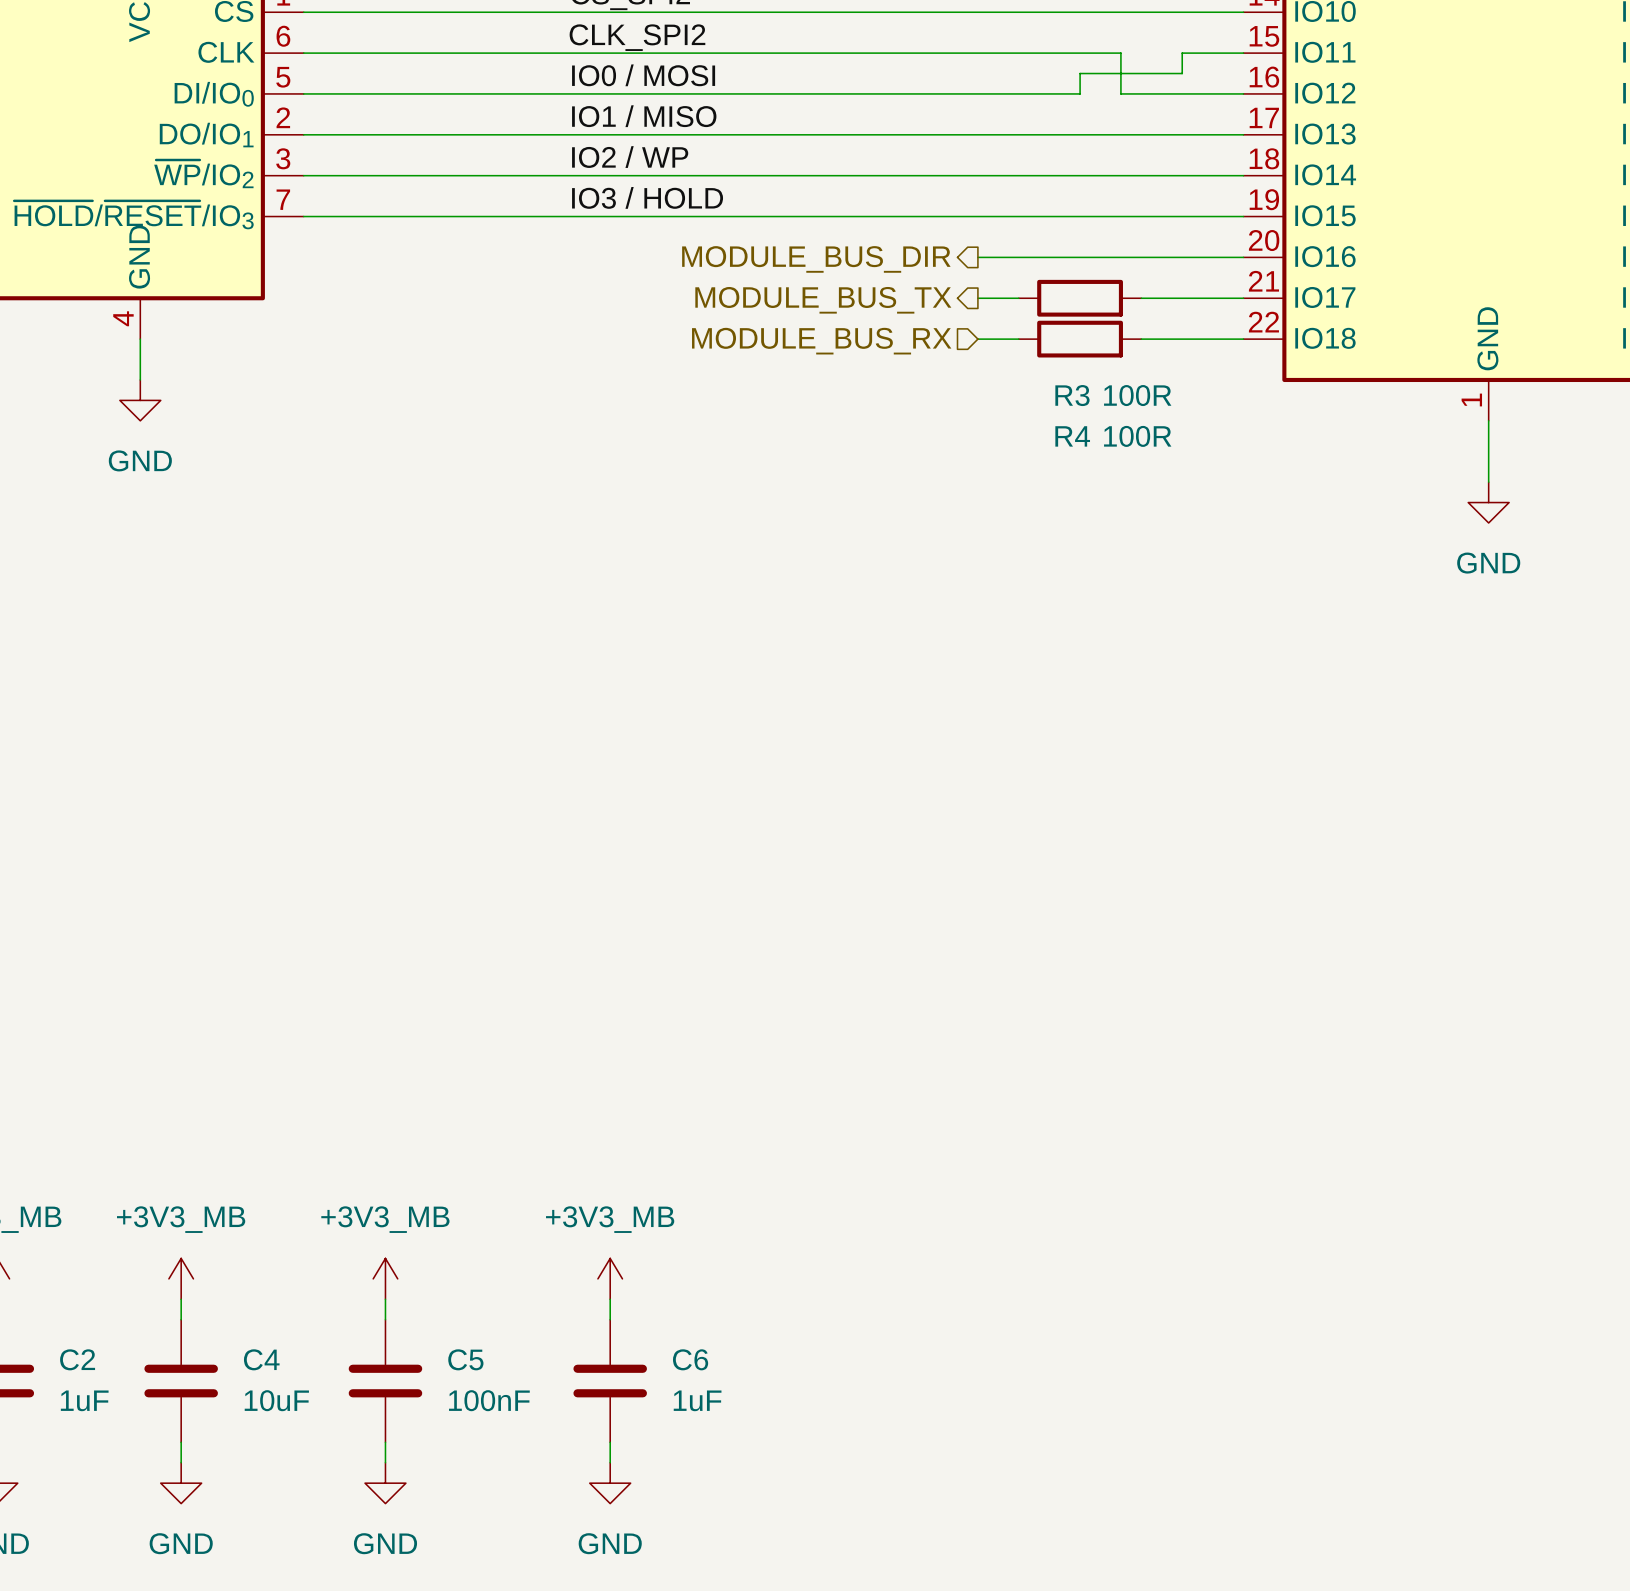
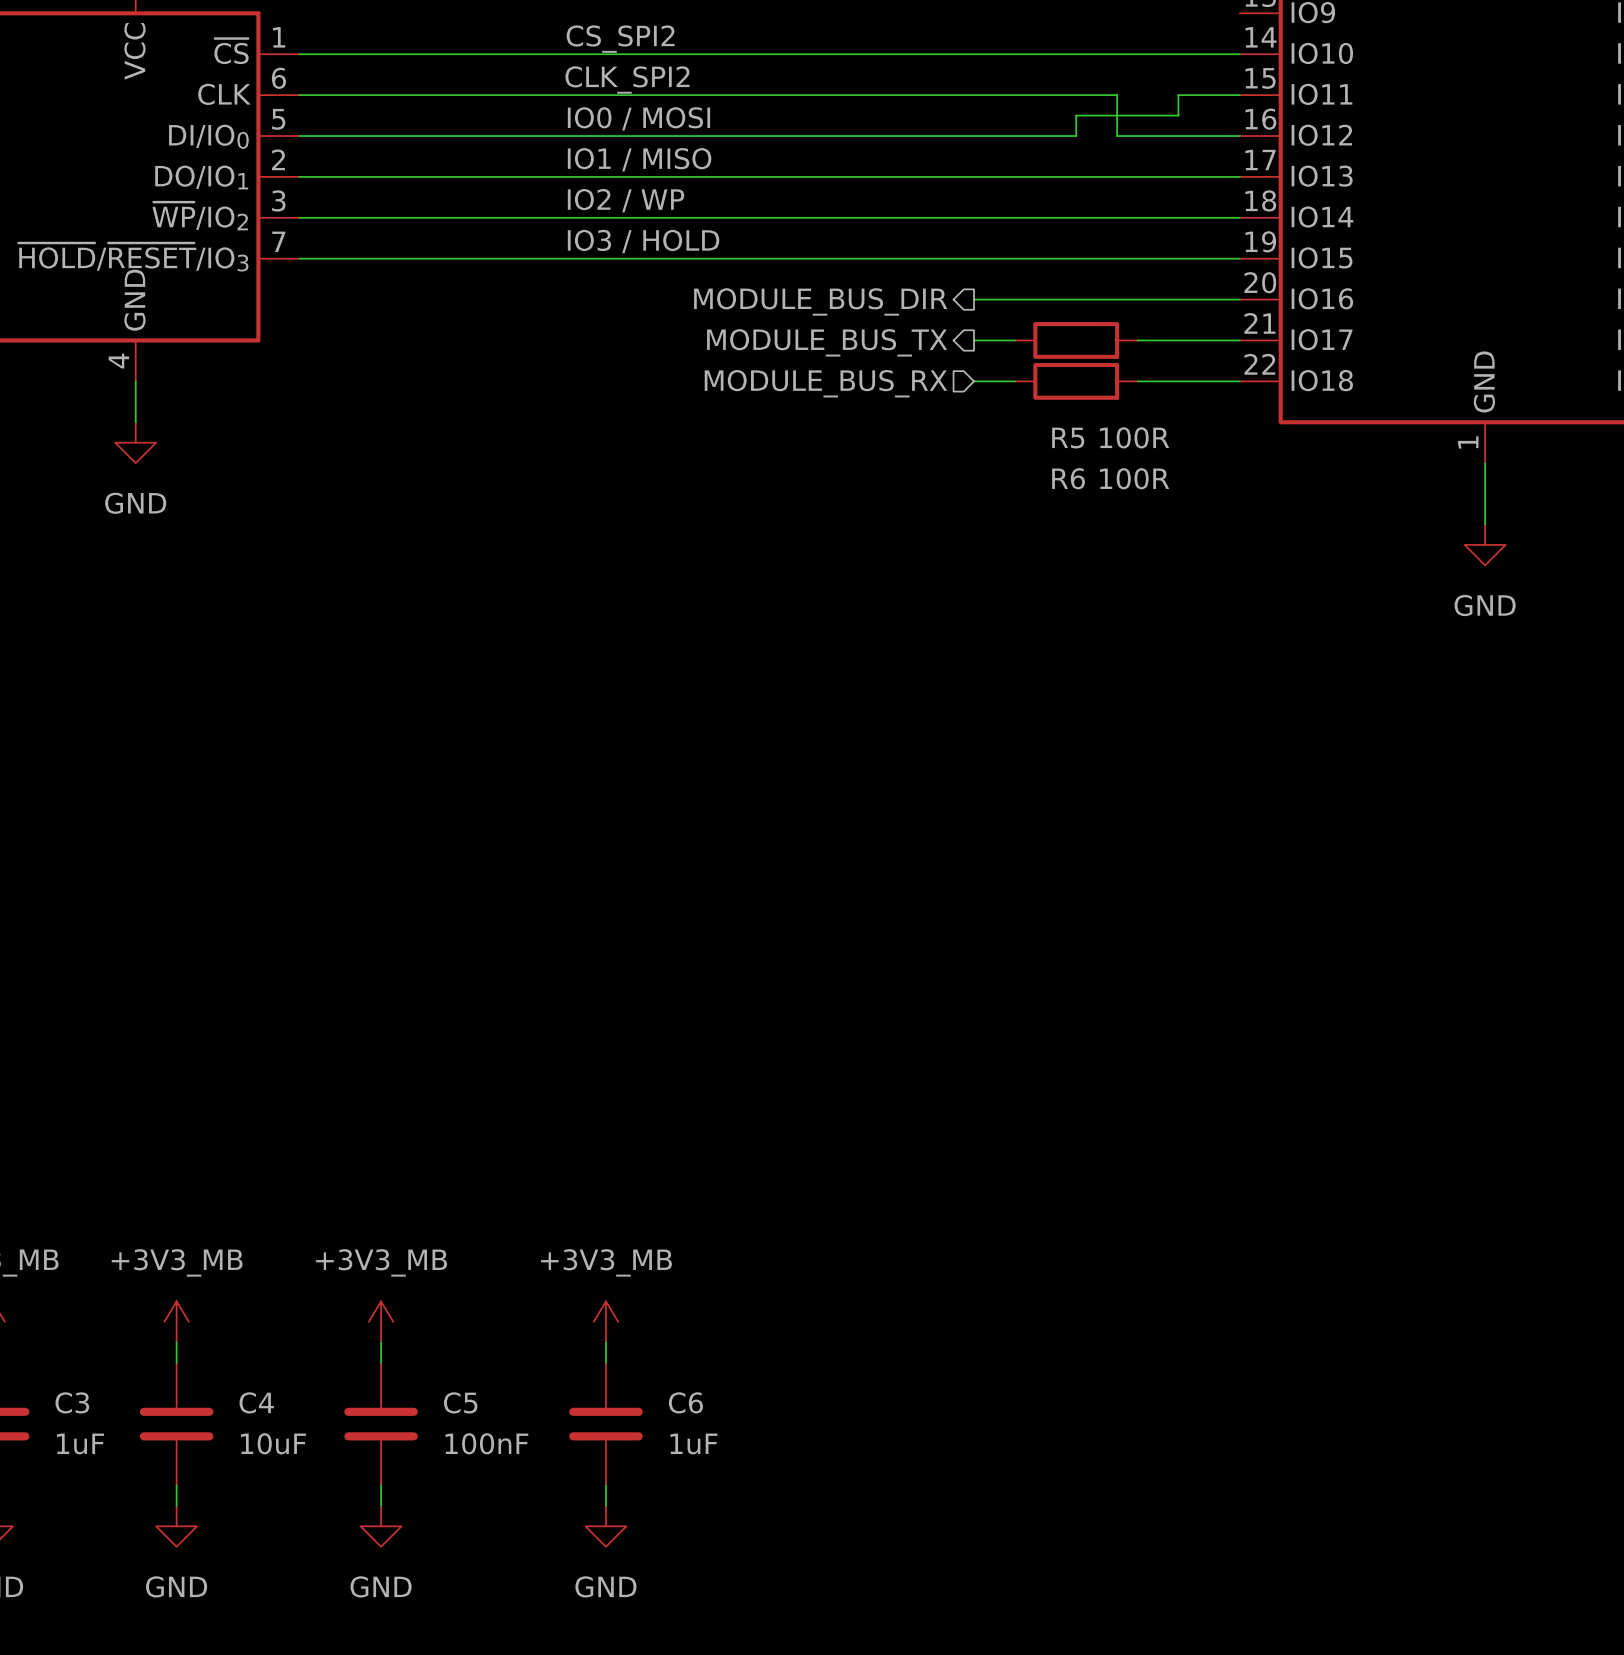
R3 name: R3 (1072, 395) -> R5 (1068, 438)
R4 name: R4 (1072, 436) -> R6 (1068, 478)
C2 name: C2 (77, 1359) -> C3 (72, 1402)

